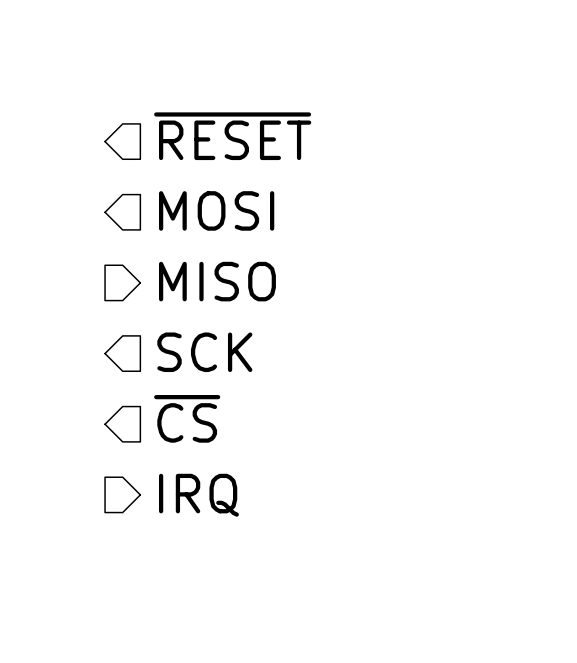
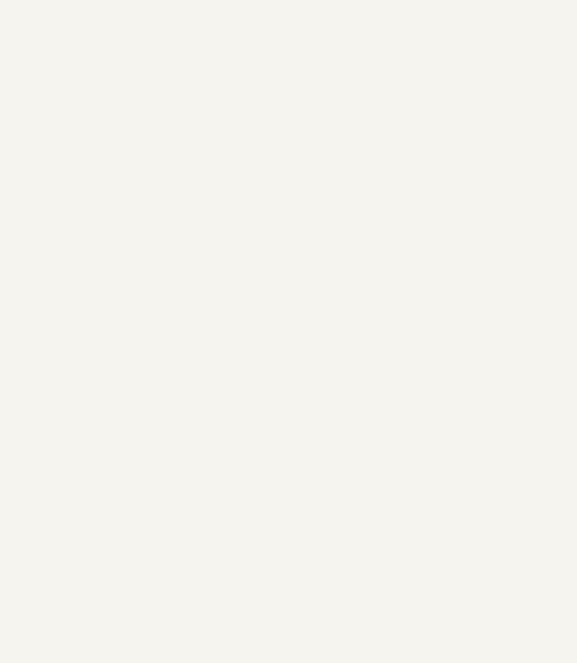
hierarchical label: ~{RESET} (232, 136) -> none
hierarchical label: MOSI (216, 210) -> none
hierarchical label: MISO (217, 281) -> none
hierarchical label: SCK (204, 352) -> none
hierarchical label: ~{CS} (187, 418) -> none
hierarchical label: IRQ (198, 495) -> none

